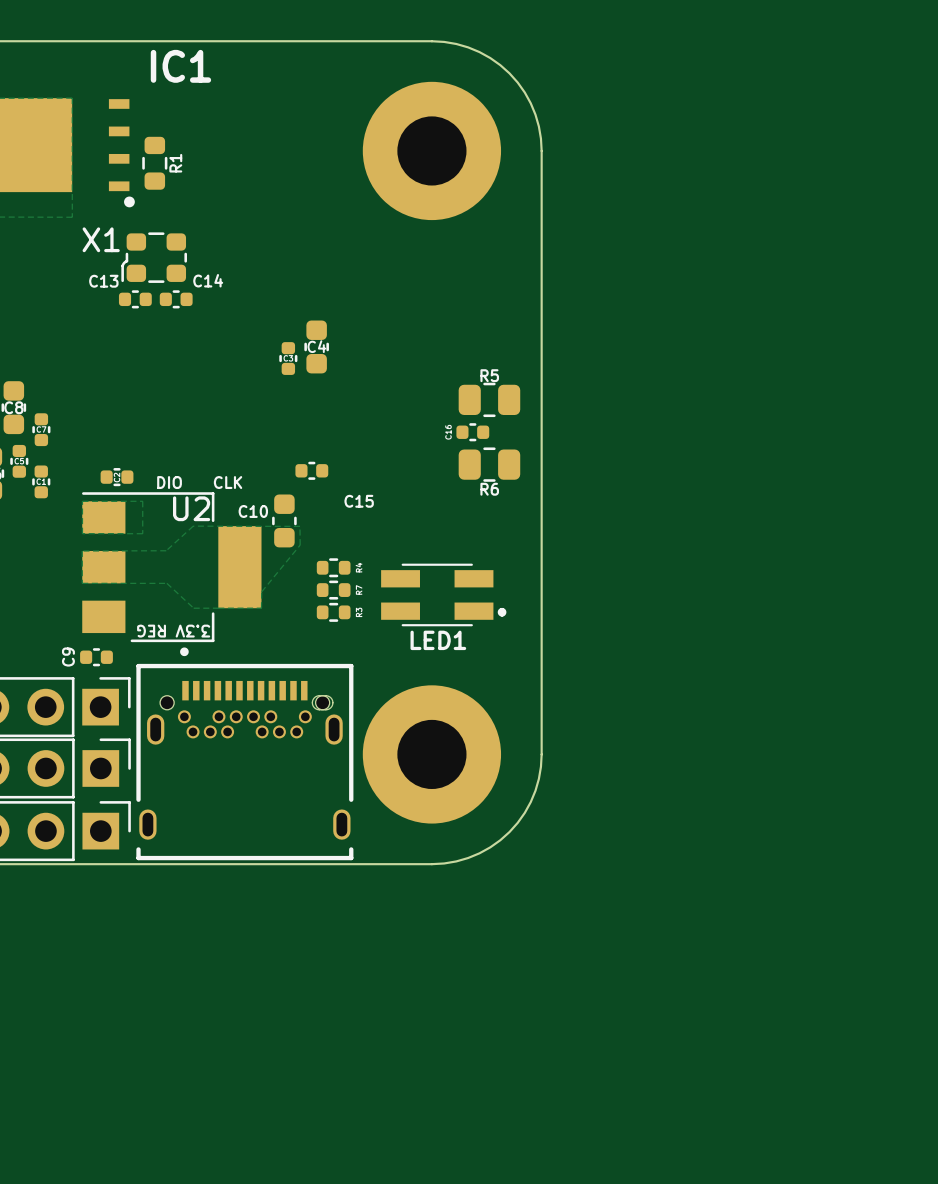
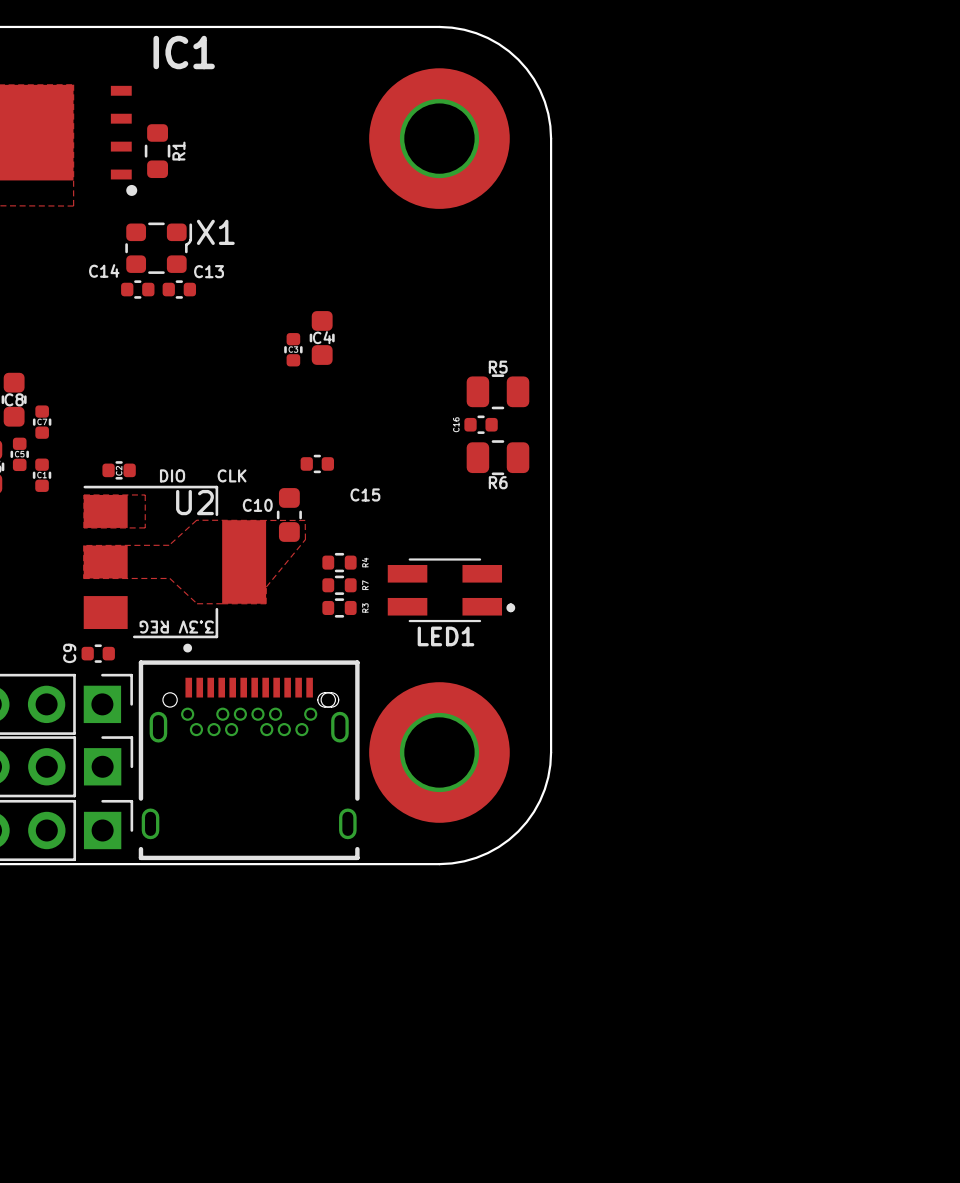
X1 rotation: 0° (154, 257) -> 180° (158, 248)
C14 name: C14 (208, 280) -> C13 (209, 271)
C13 name: C13 (103, 281) -> C14 (104, 270)

